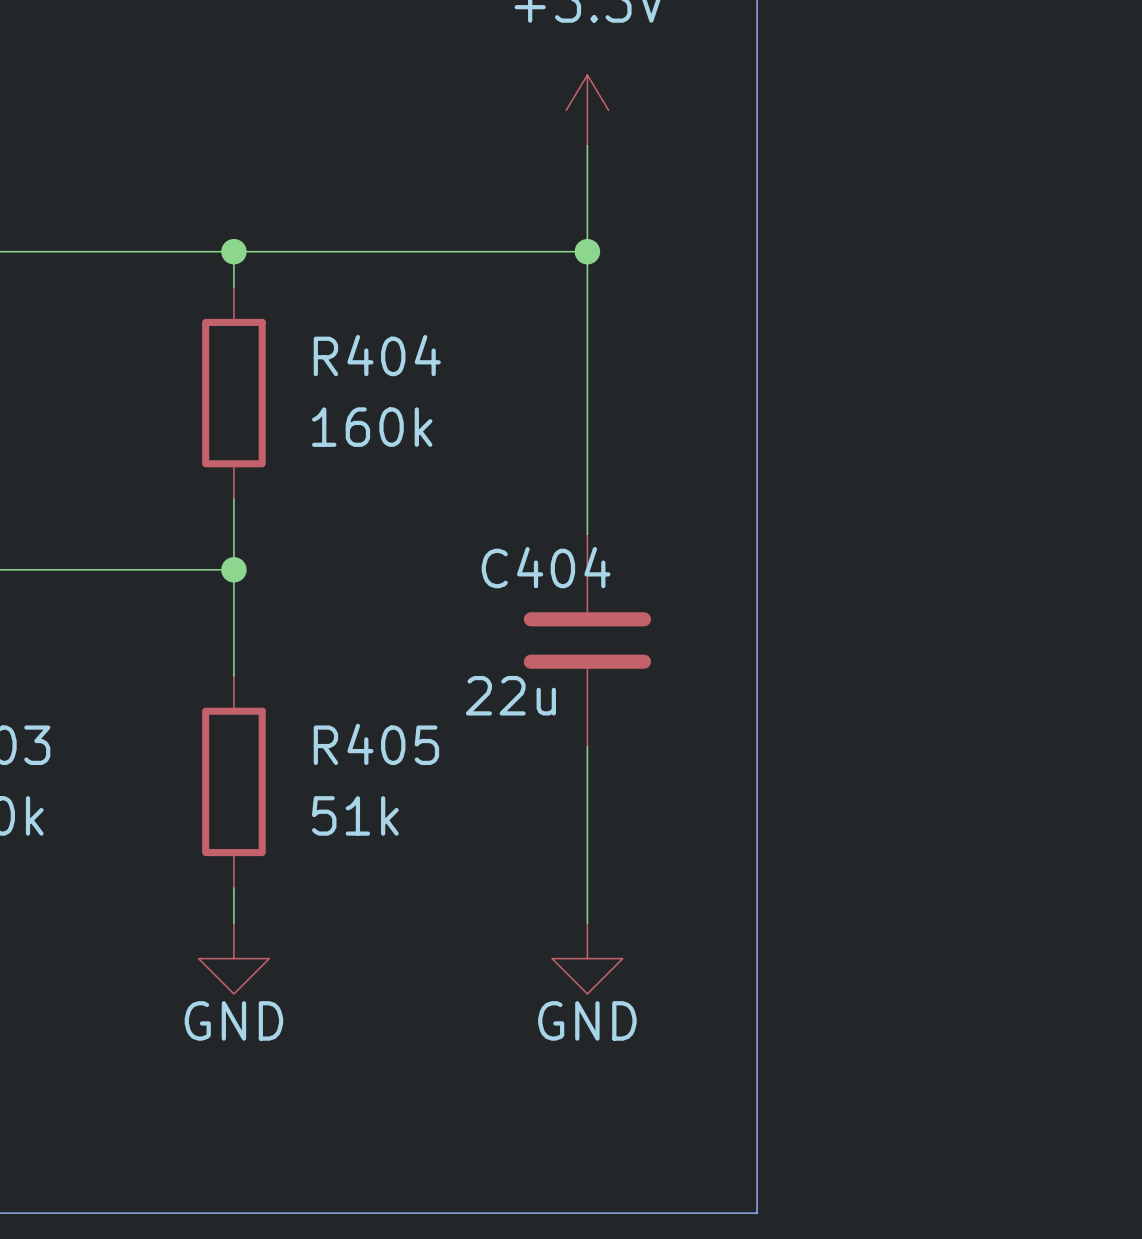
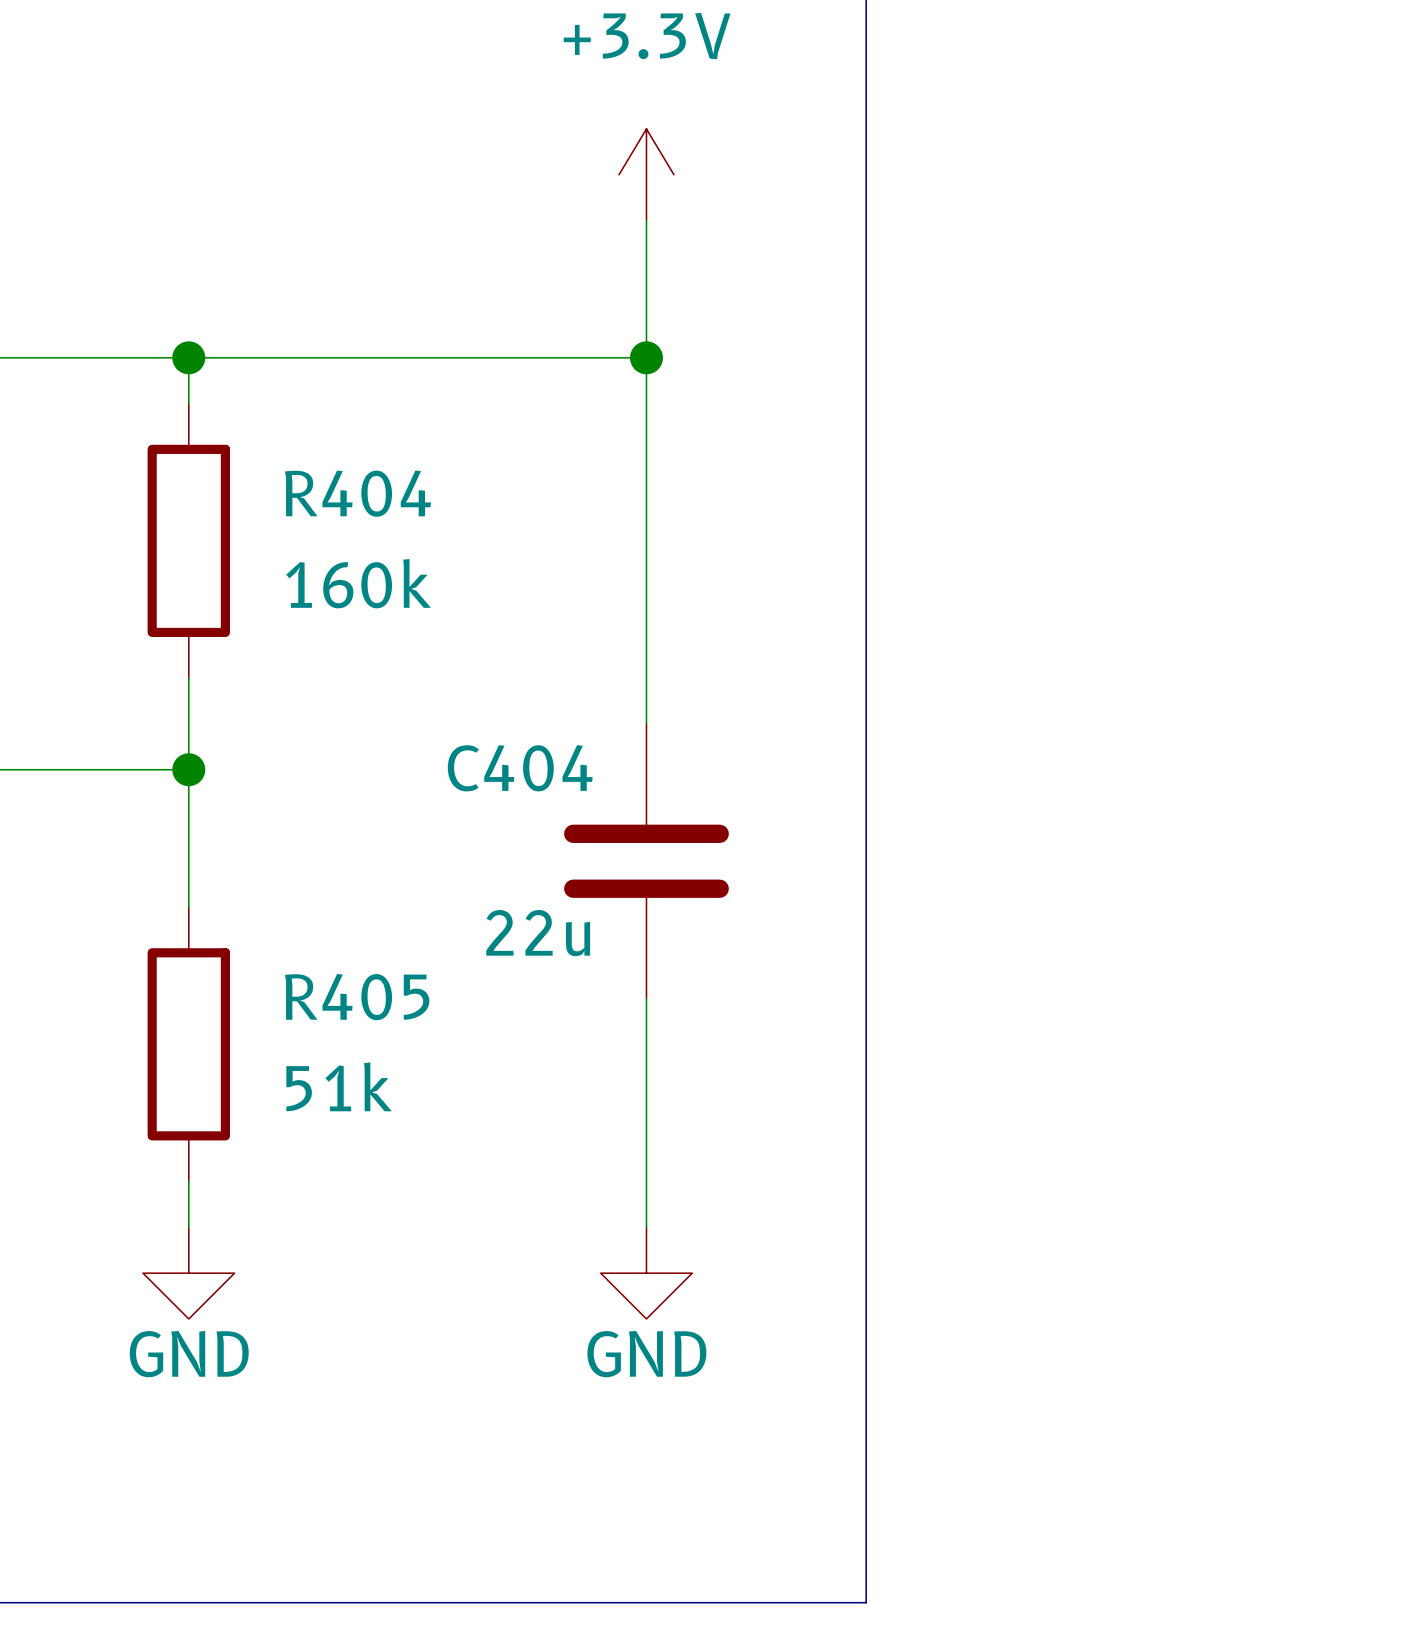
C404 name position: C404 (546, 567) -> C404 (520, 768)

